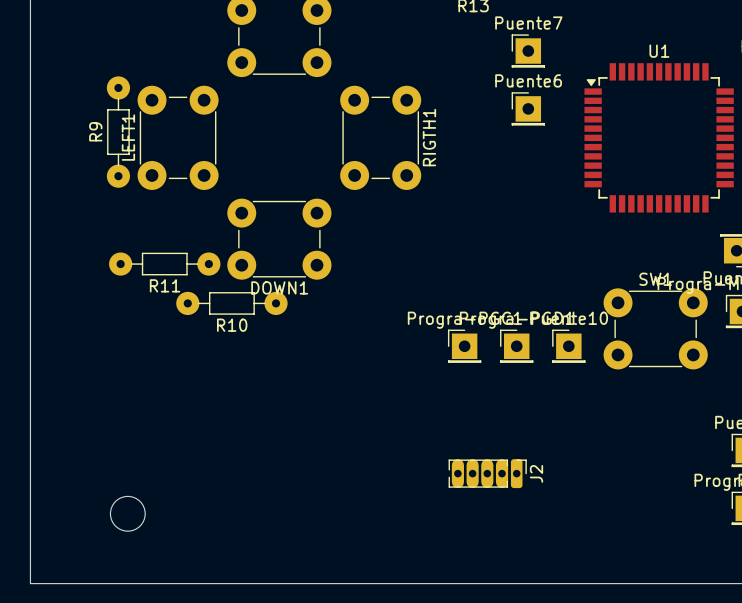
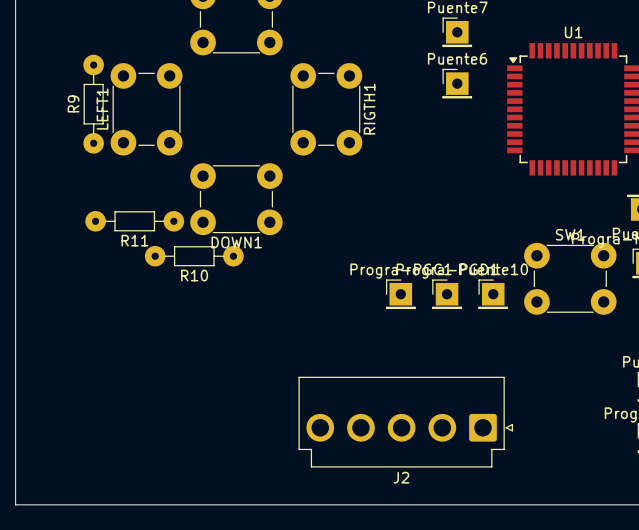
J2 footprint: [448, 459, 527, 489] -> [298, 376, 513, 468]
J2 name position: J2 (536, 473) -> J2 (401, 477)
round board edge: [110, 496, 146, 532] -> none

